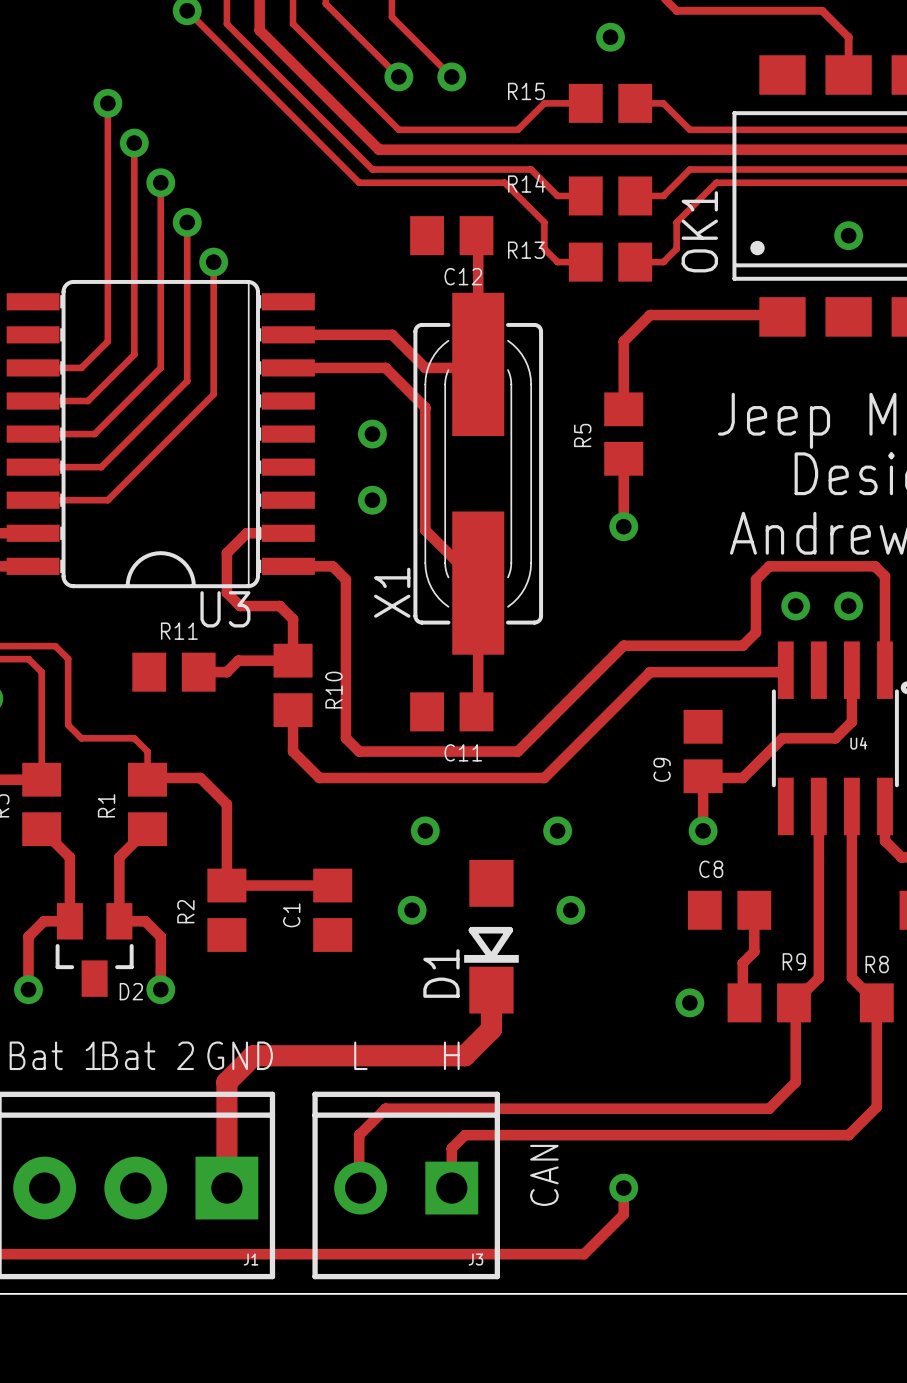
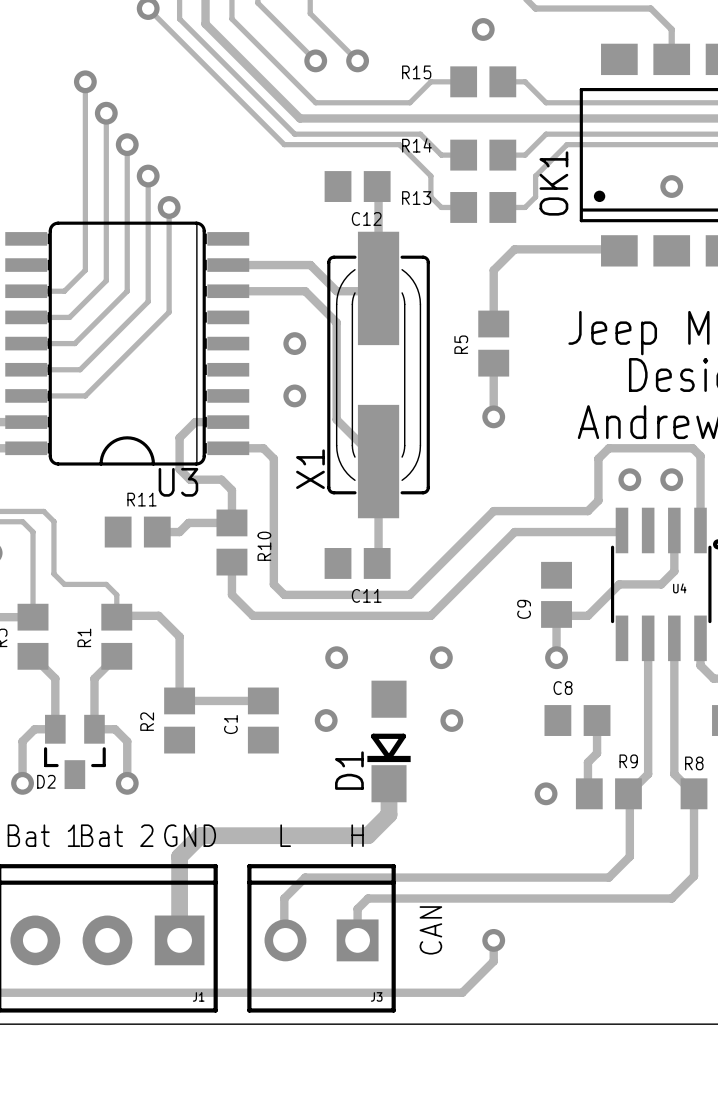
D2 name position: D2 (131, 991) -> D2 (46, 781)

